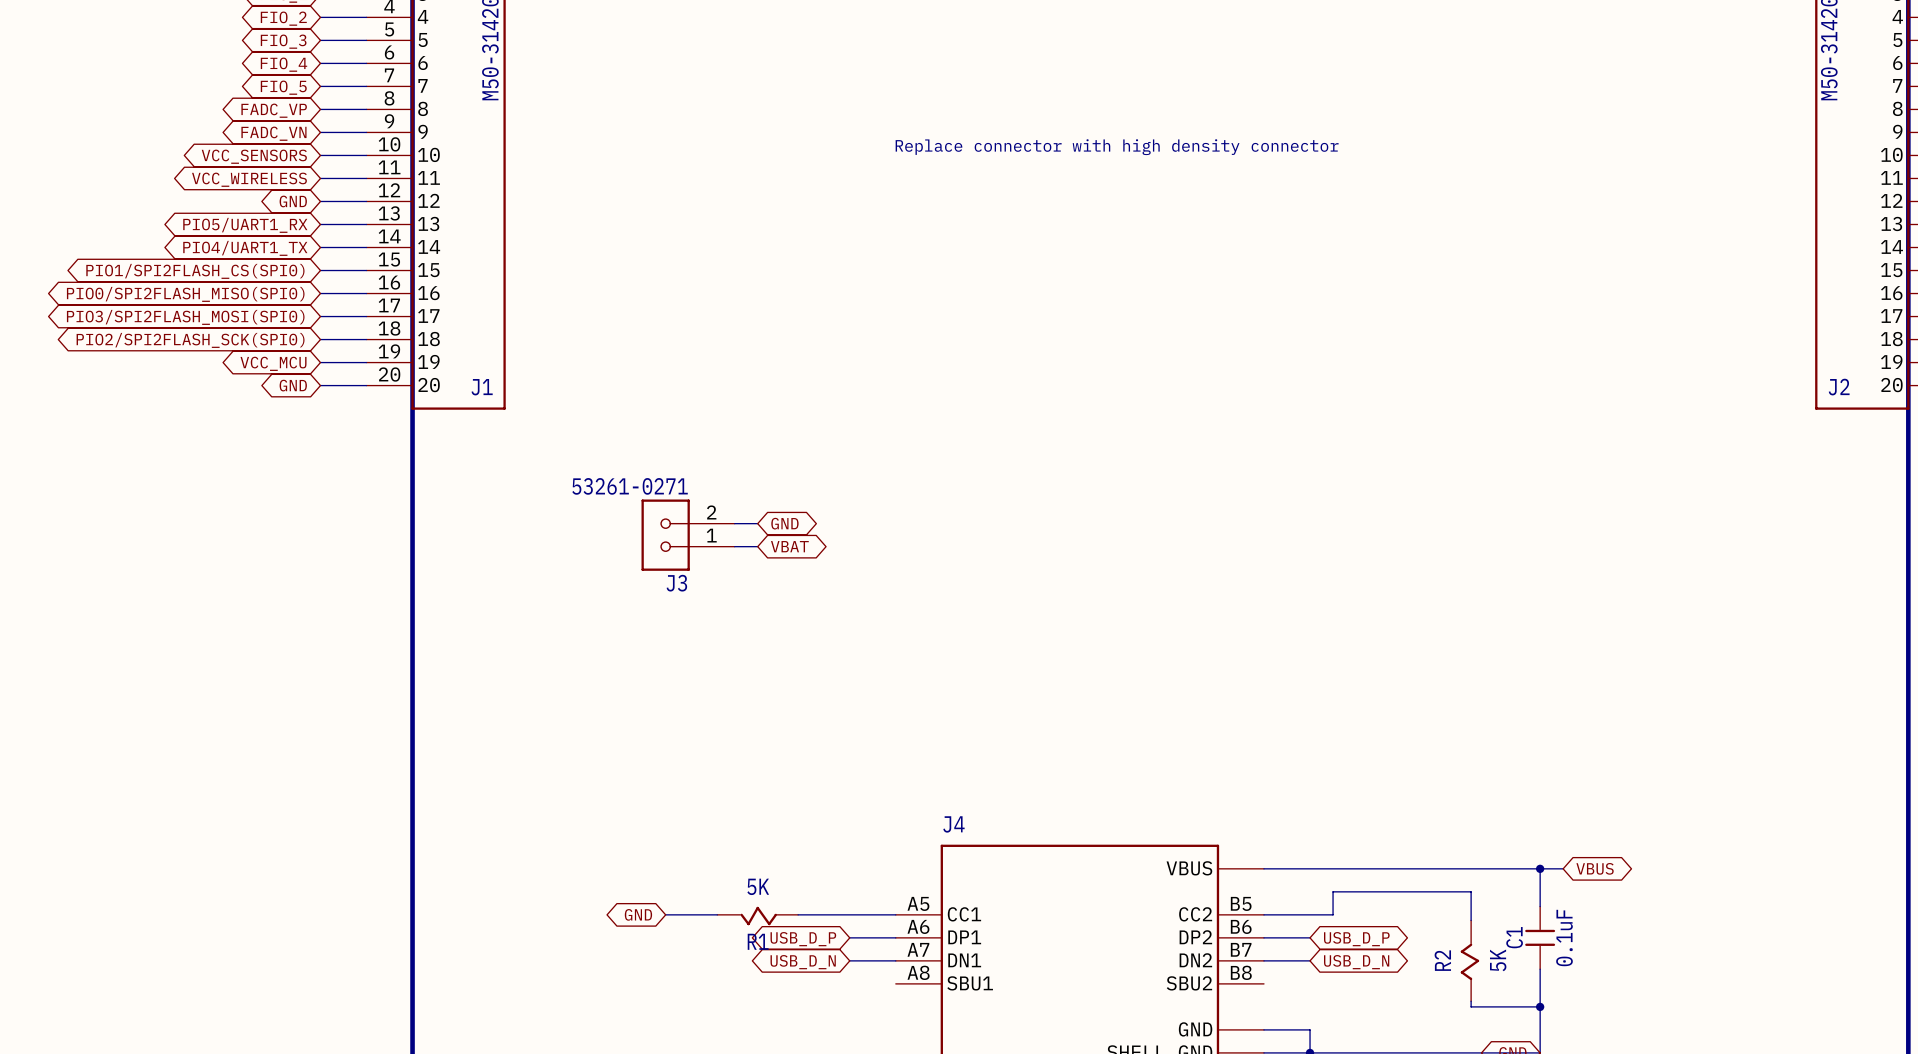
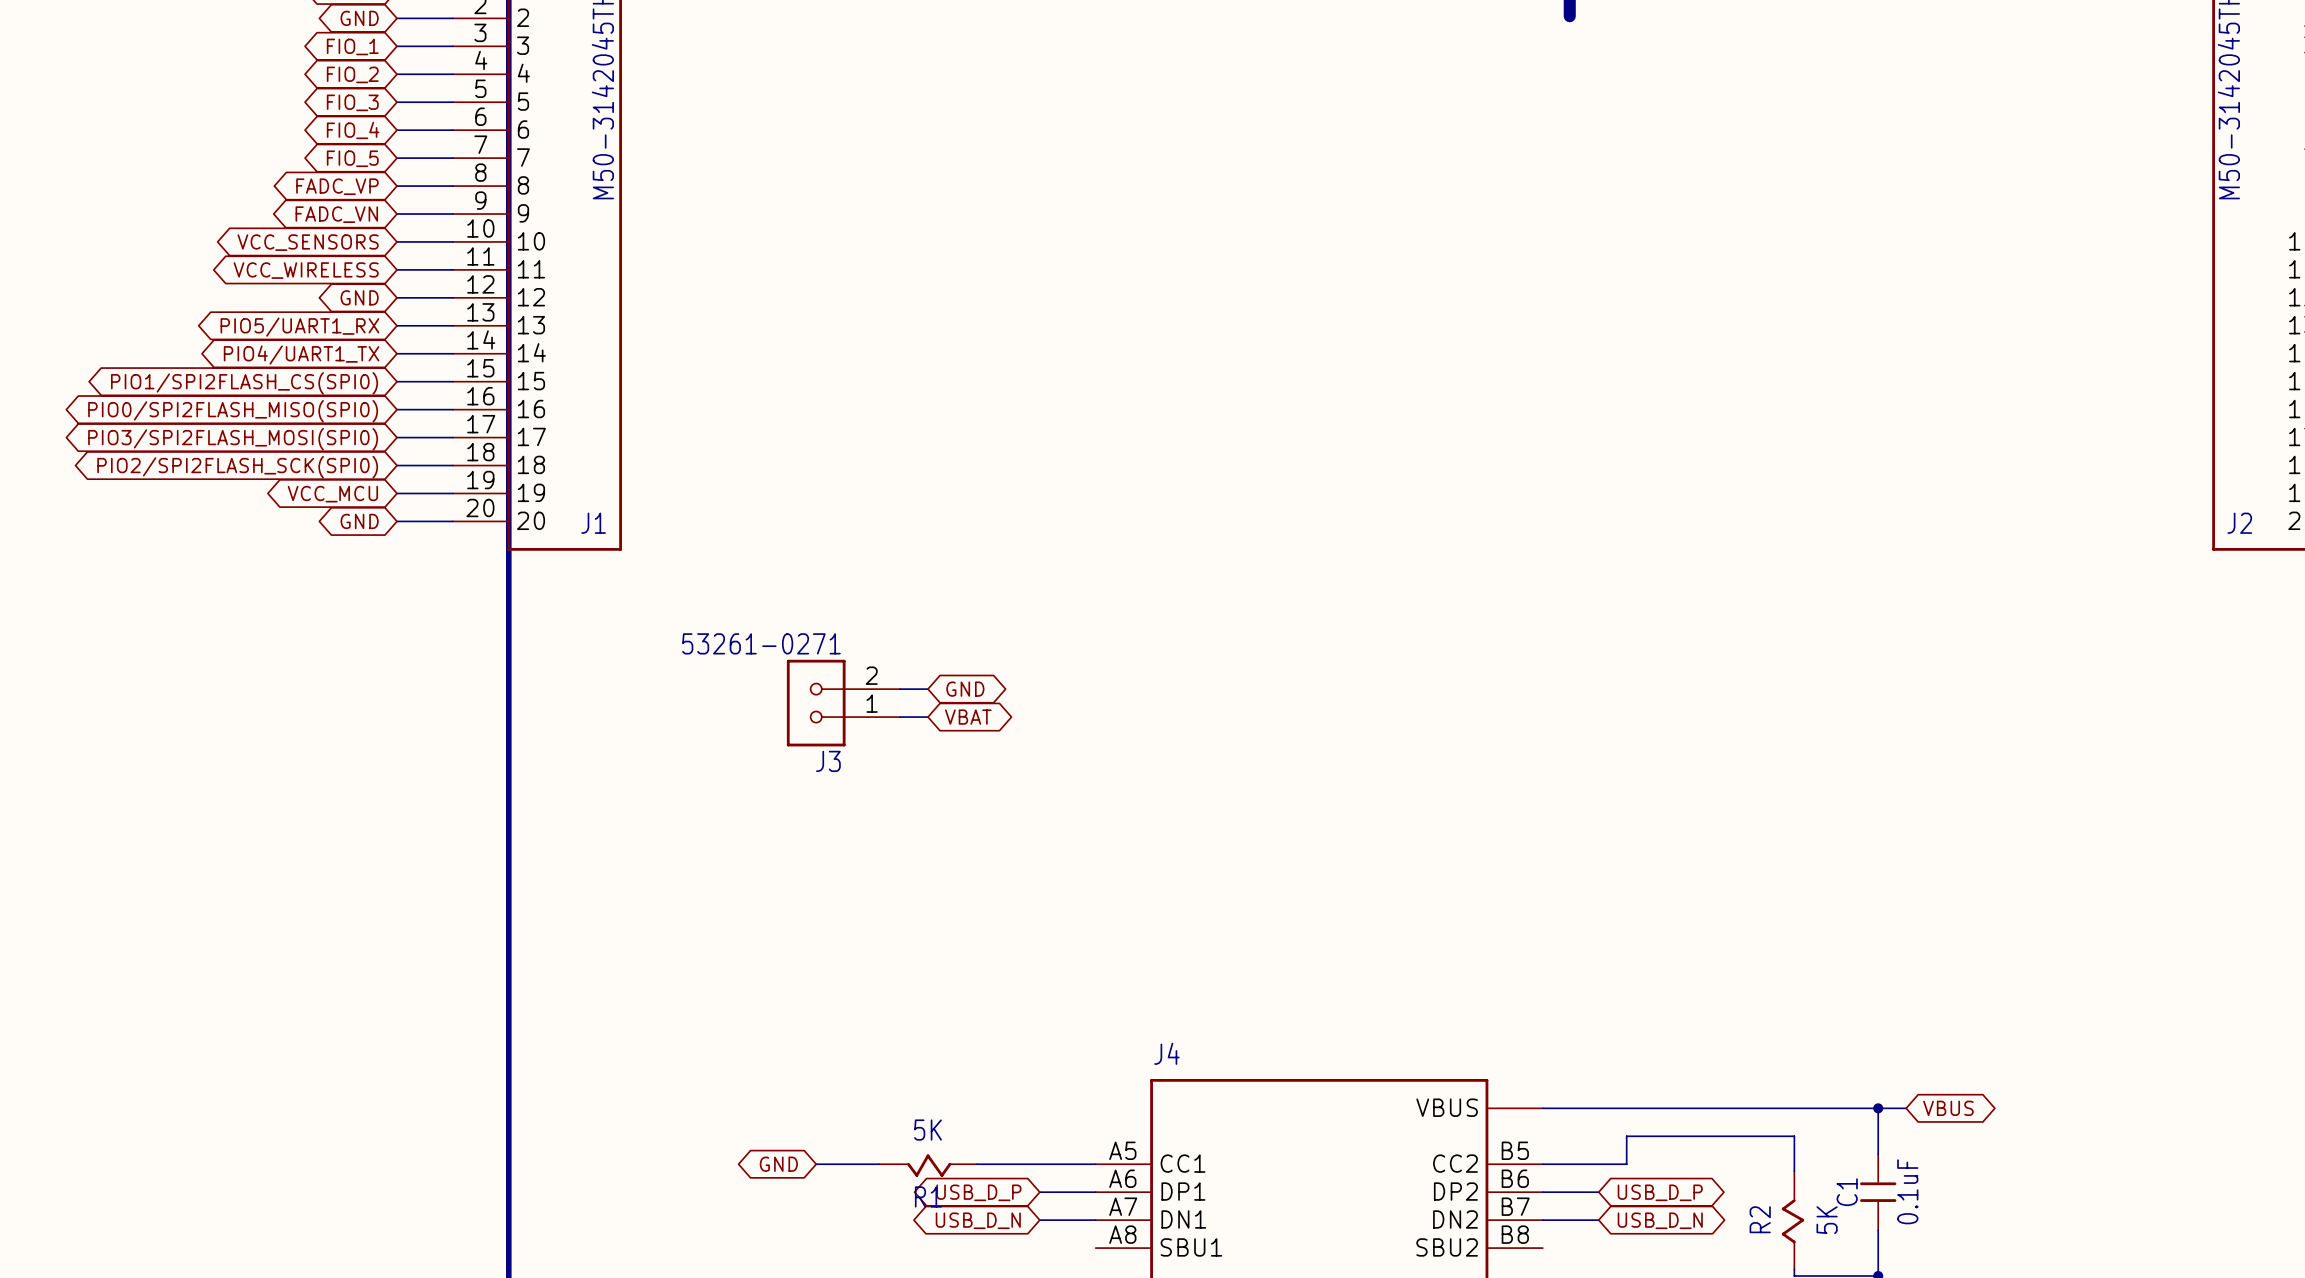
text: Replace connector with high density connector (1117, 147) -> none

